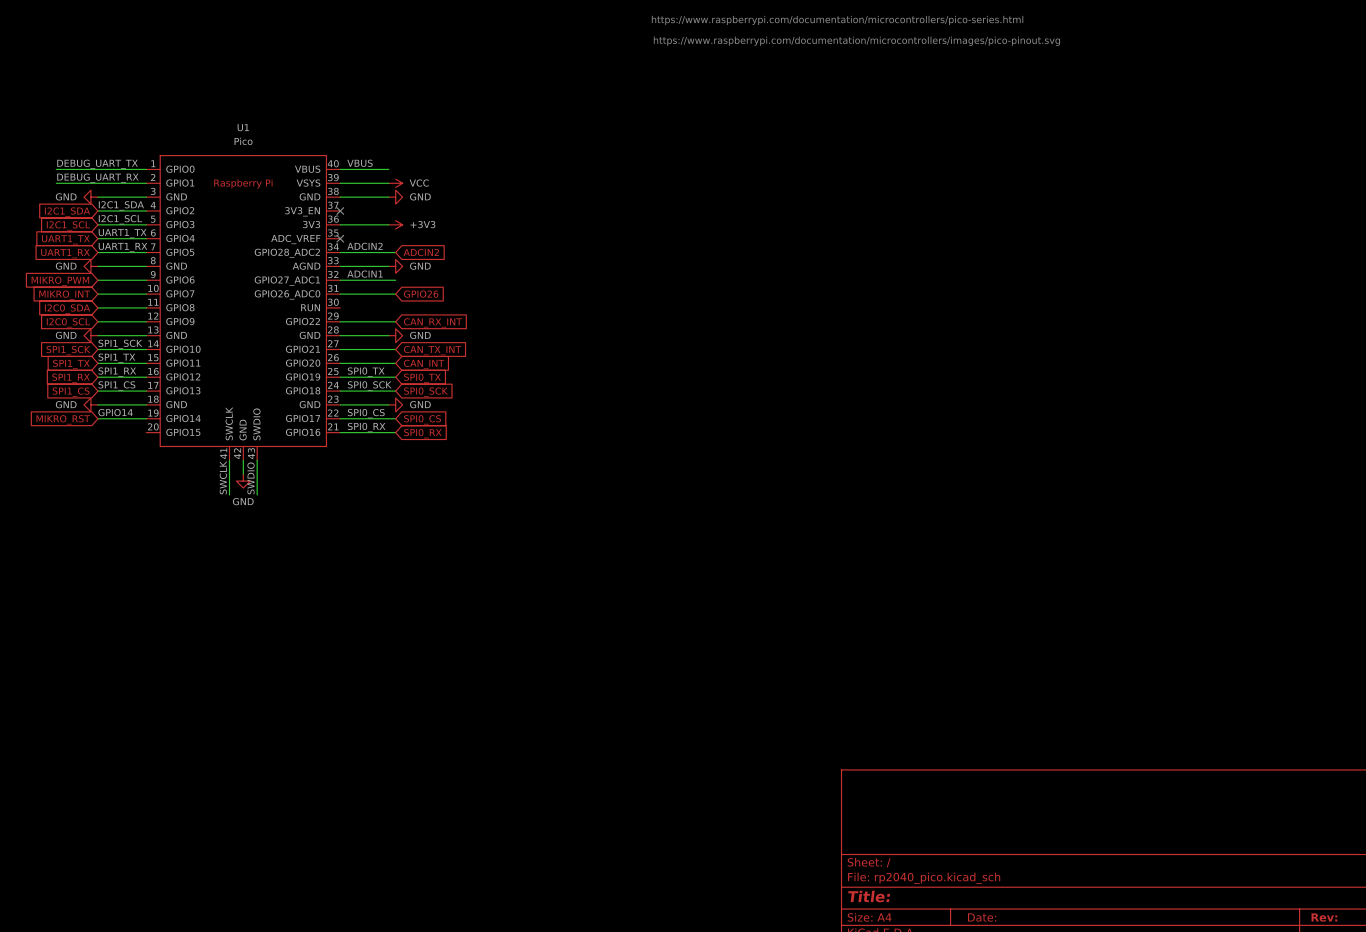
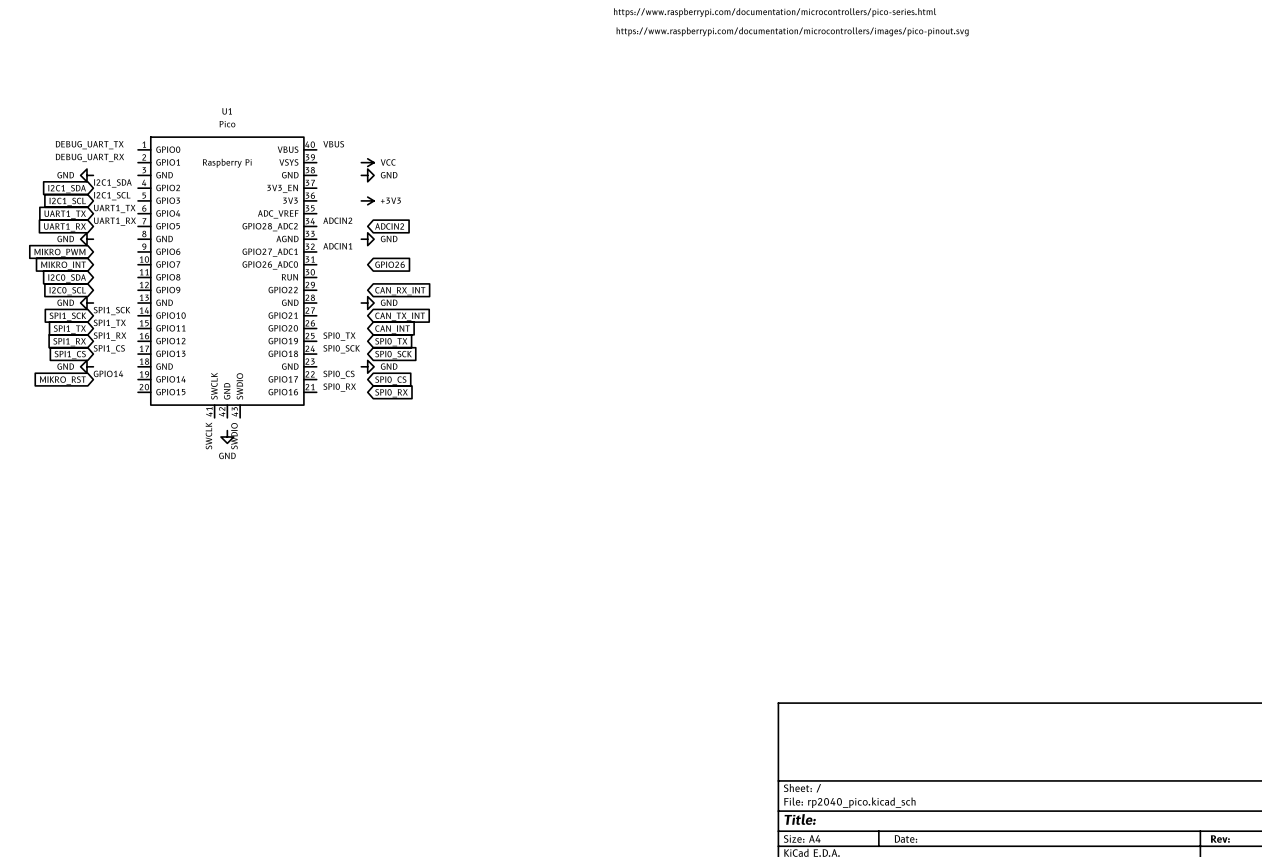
wire: (56, 169) (146, 169) -> none
wire: (340, 169) (388, 169) -> none
wire: (56, 183) (146, 183) -> none
wire: (340, 183) (388, 183) -> none
wire: (97, 197) (146, 197) -> none
wire: (340, 197) (388, 197) -> none
wire: (97, 210) (146, 210) -> none
no-connect mark: (340, 210) -> none
wire: (97, 224) (146, 224) -> none
wire: (340, 224) (388, 224) -> none
wire: (97, 238) (146, 238) -> none
no-connect mark: (340, 238) -> none
wire: (97, 252) (146, 252) -> none
wire: (340, 252) (395, 252) -> none
wire: (97, 266) (146, 266) -> none
wire: (340, 266) (388, 266) -> none
wire: (97, 280) (146, 280) -> none
wire: (340, 280) (395, 280) -> none
wire: (97, 294) (146, 294) -> none
wire: (340, 294) (395, 294) -> none
wire: (97, 307) (146, 307) -> none
wire: (97, 321) (146, 321) -> none
wire: (340, 321) (395, 321) -> none
wire: (97, 335) (146, 335) -> none
wire: (340, 335) (388, 335) -> none
wire: (97, 349) (146, 349) -> none
wire: (340, 349) (395, 349) -> none
wire: (97, 363) (146, 363) -> none
wire: (340, 363) (395, 363) -> none
wire: (97, 377) (146, 377) -> none
wire: (340, 377) (395, 377) -> none
wire: (97, 391) (146, 391) -> none
wire: (340, 391) (395, 391) -> none
wire: (97, 404) (146, 404) -> none
wire: (340, 404) (388, 404) -> none
wire: (97, 418) (146, 418) -> none
wire: (340, 418) (395, 418) -> none
wire: (340, 432) (395, 432) -> none
wire: (229, 460) (229, 494) -> none
wire: (243, 460) (243, 474) -> none
wire: (257, 460) (257, 494) -> none

